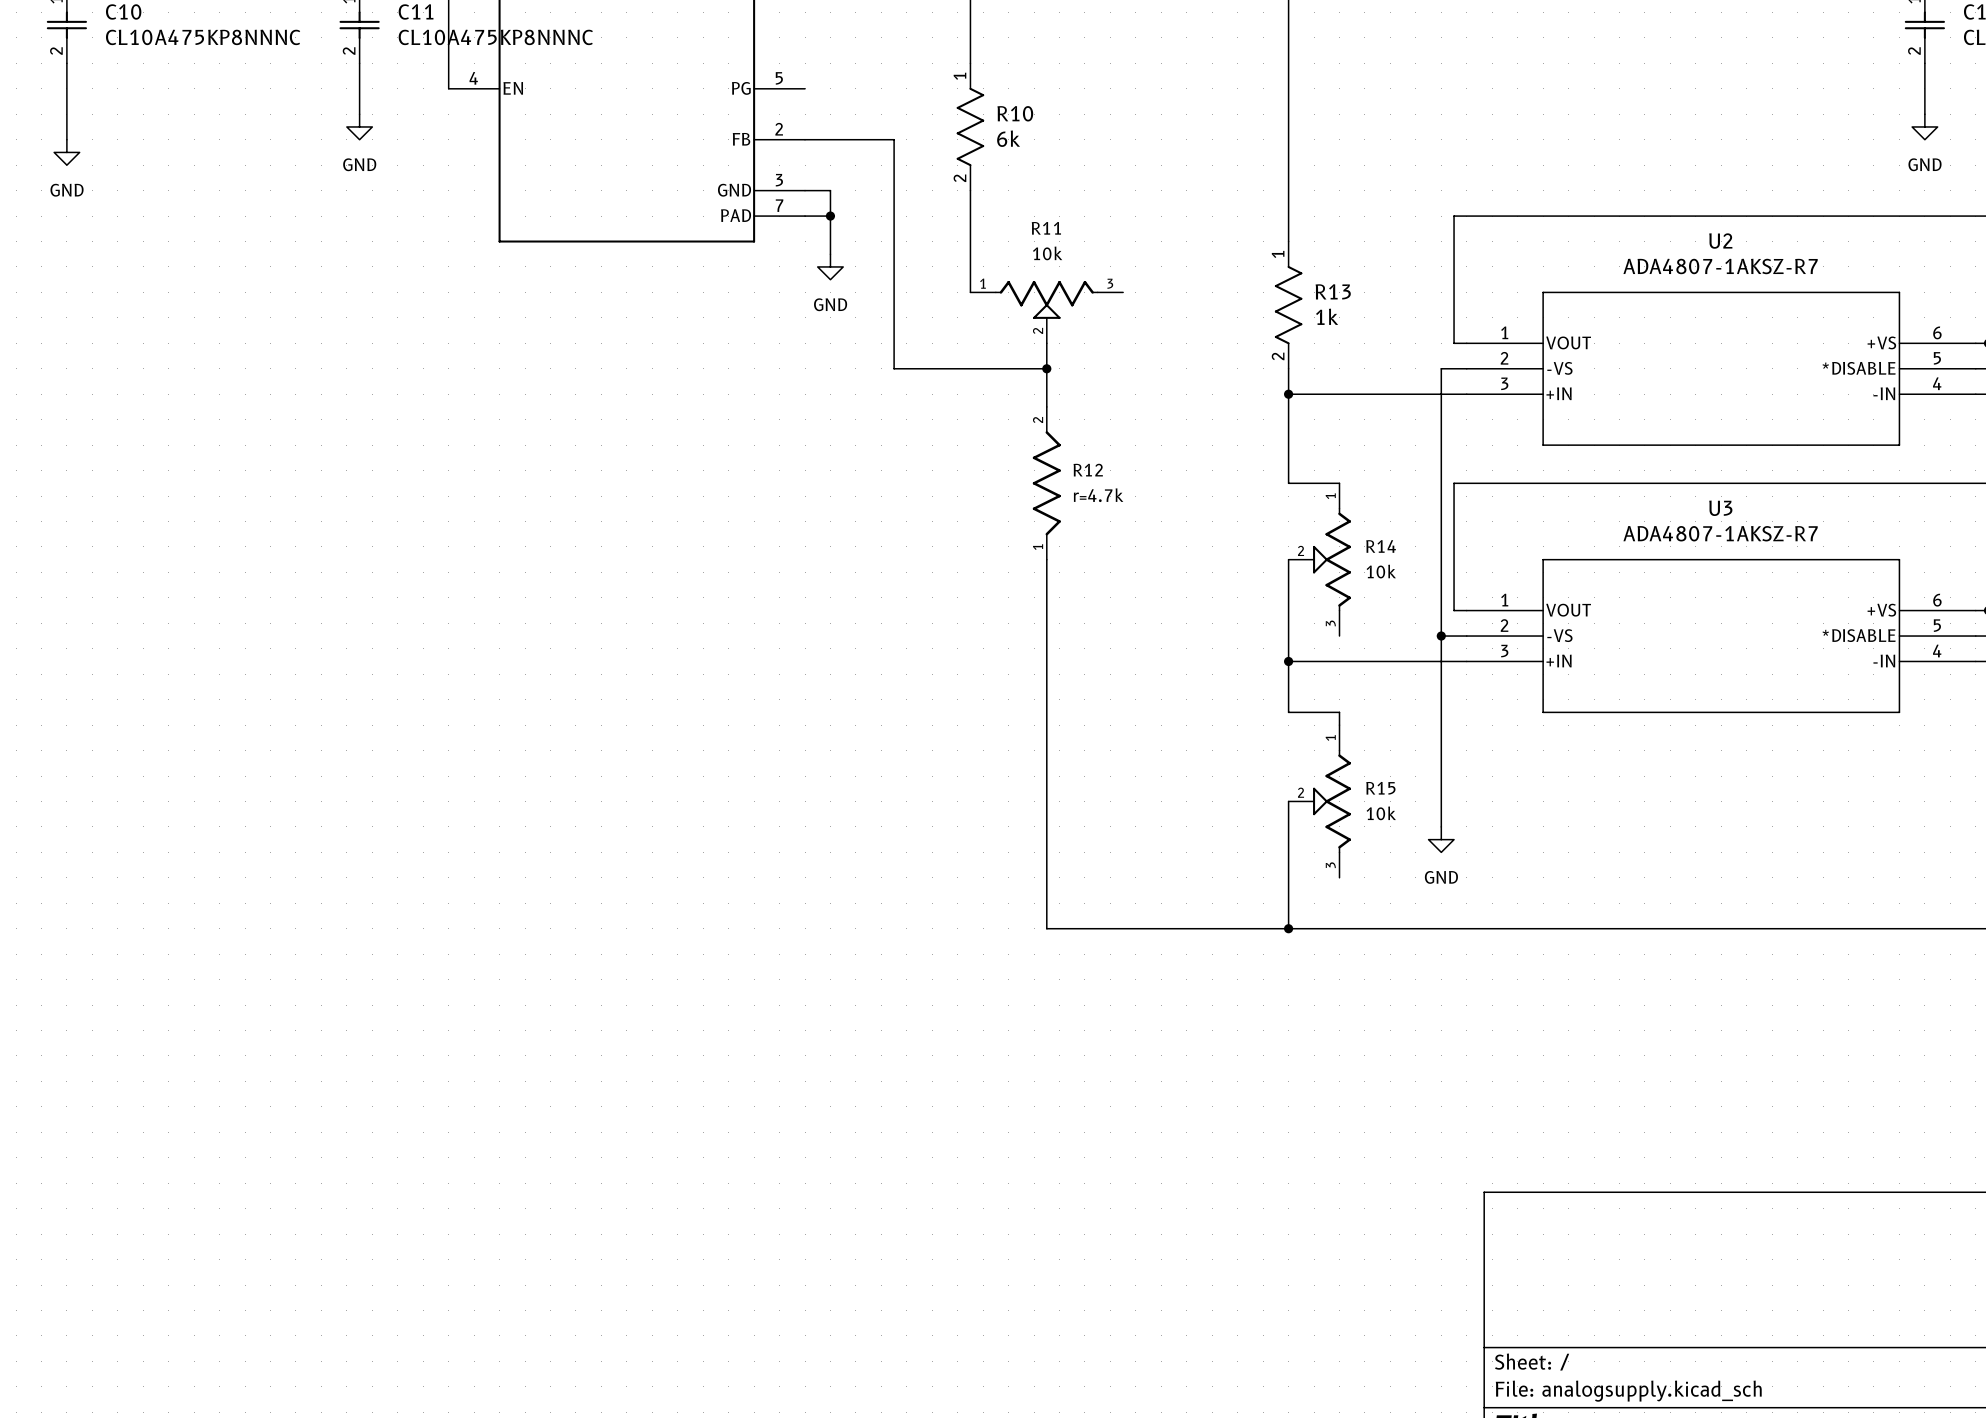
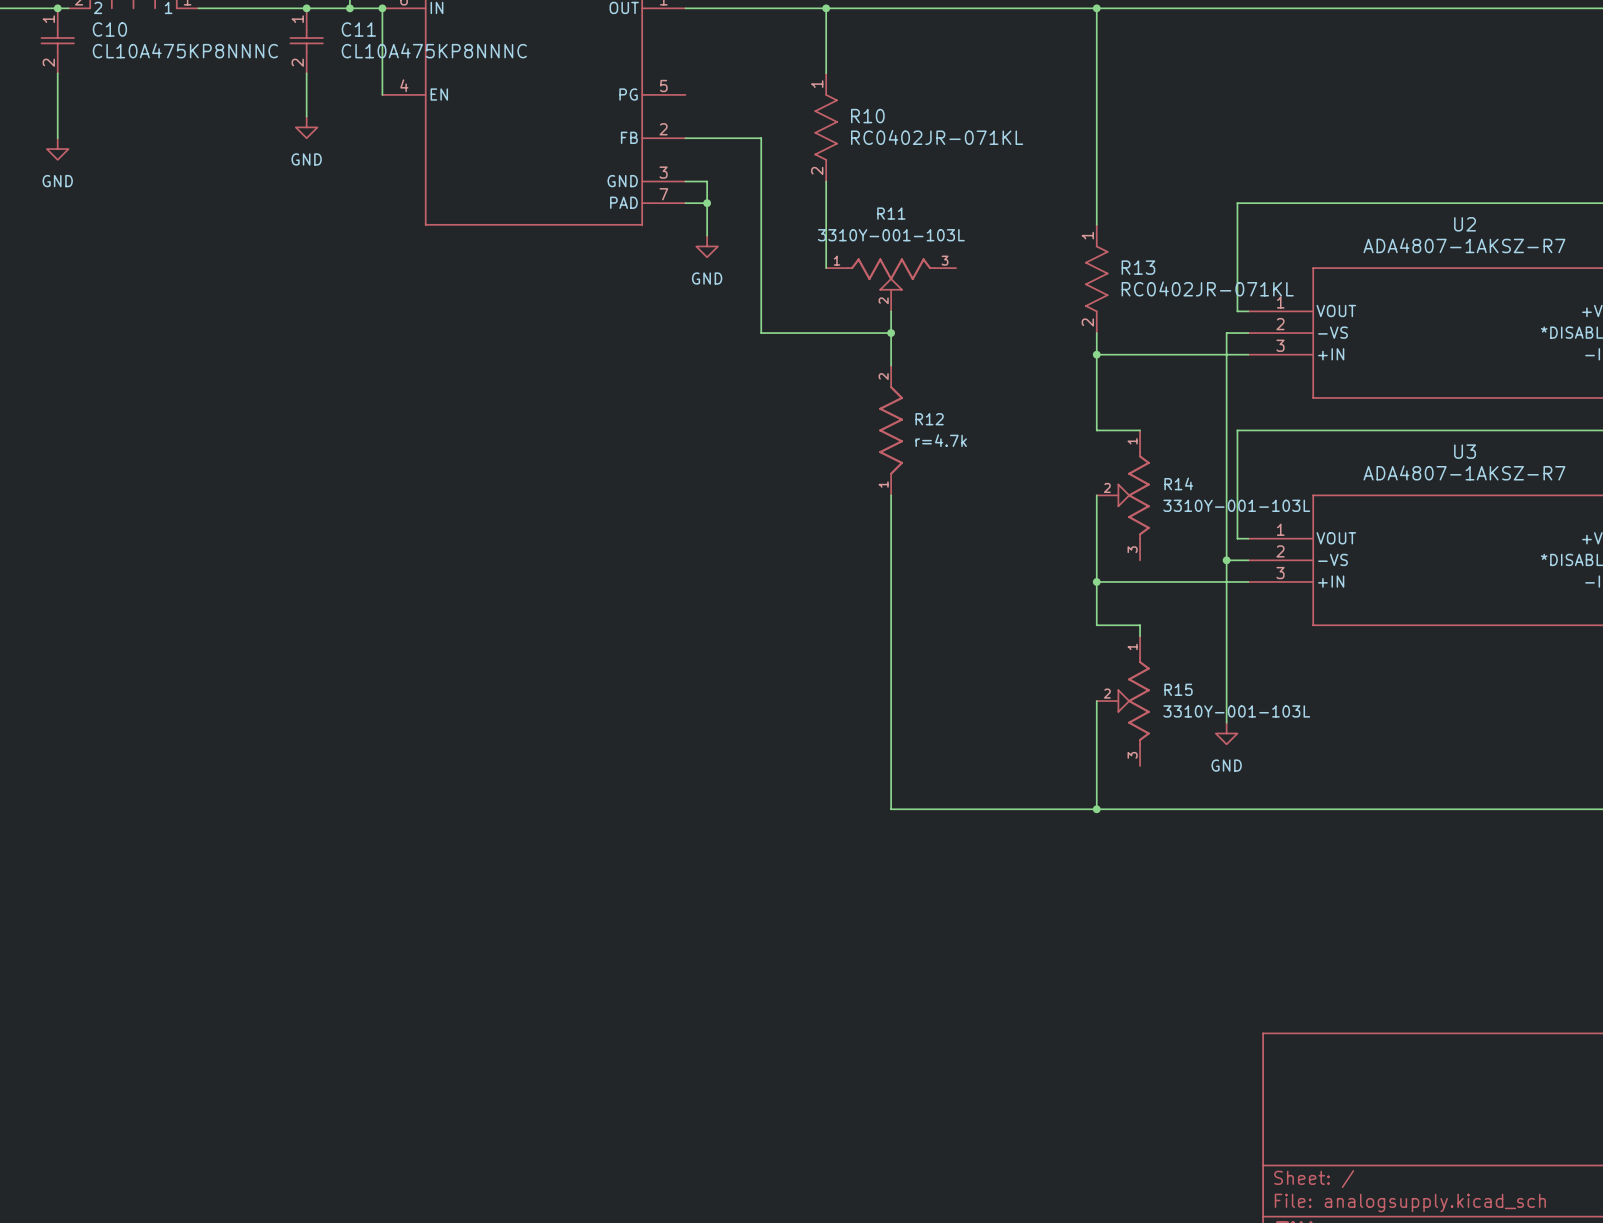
R10 value: 6k (1008, 138) -> RC0402JR-071KL (937, 137)
R11 value: 10k (1047, 253) -> 3310Y-001-103L (891, 235)
R13 value: 1k (1327, 316) -> RC0402JR-071KL (1207, 288)
R14 value: 10k (1381, 571) -> 3310Y-001-103L (1236, 505)
R15 value: 10k (1381, 813) -> 3310Y-001-103L (1236, 711)

